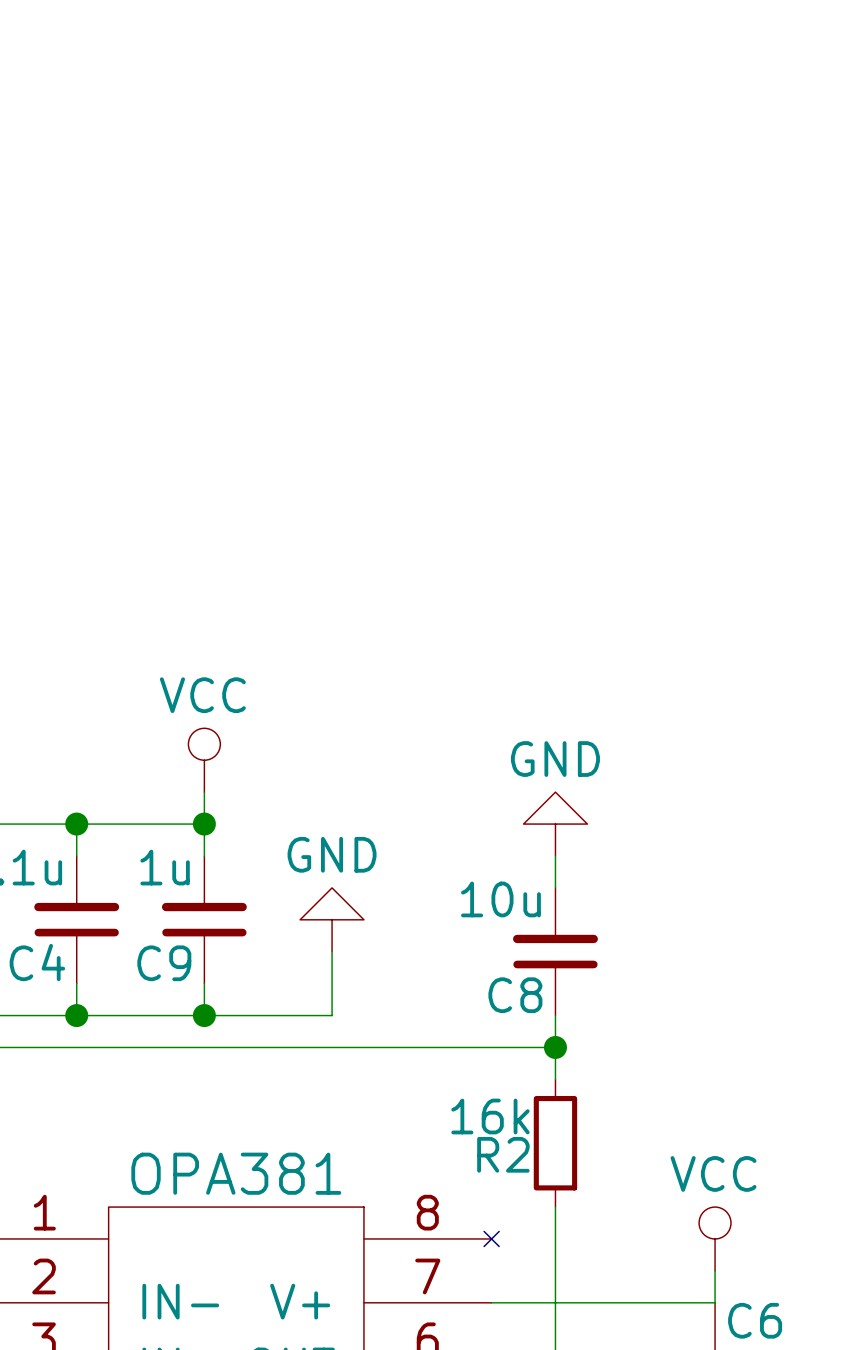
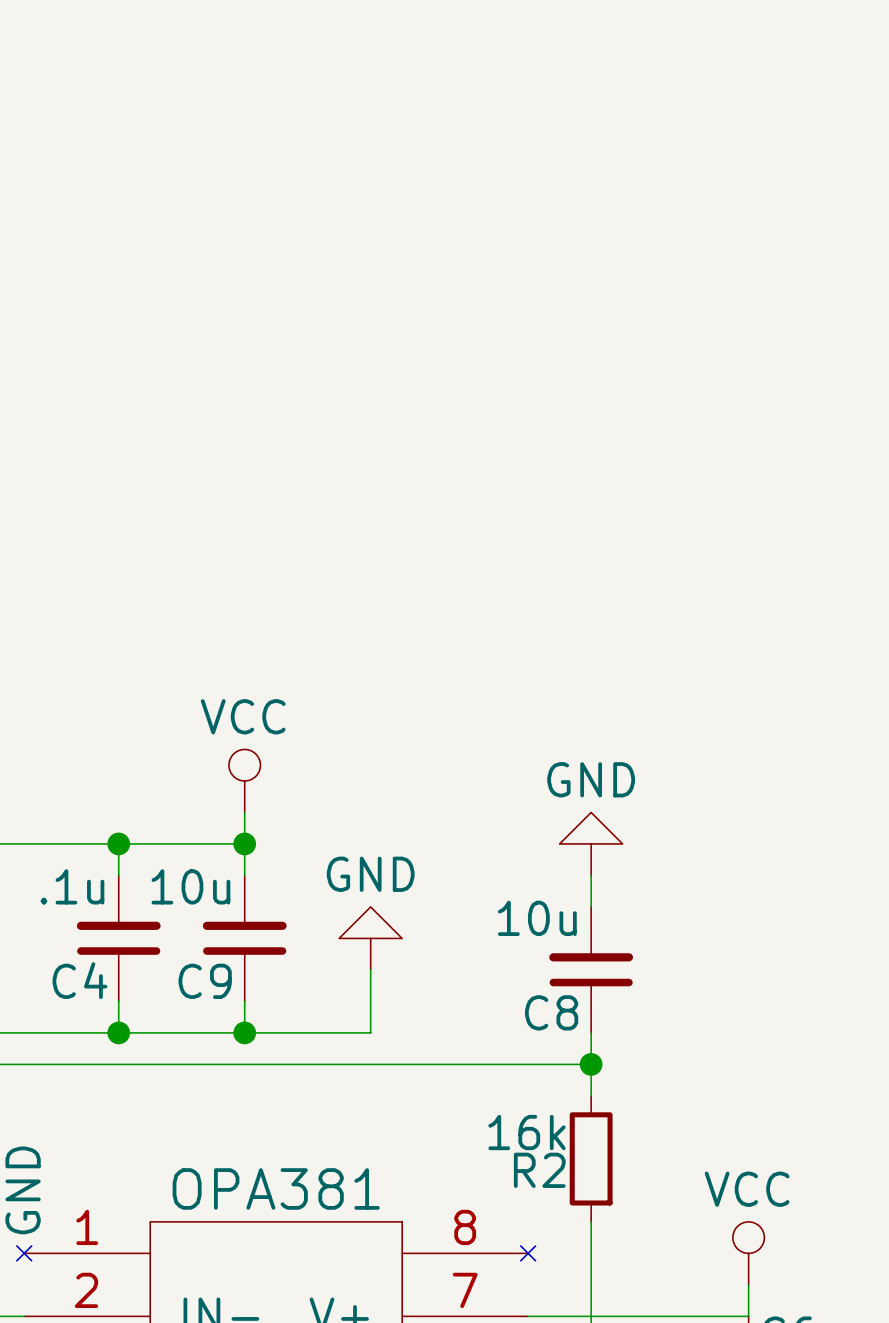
C9 value: 1u (165, 867) -> 10u (190, 886)

